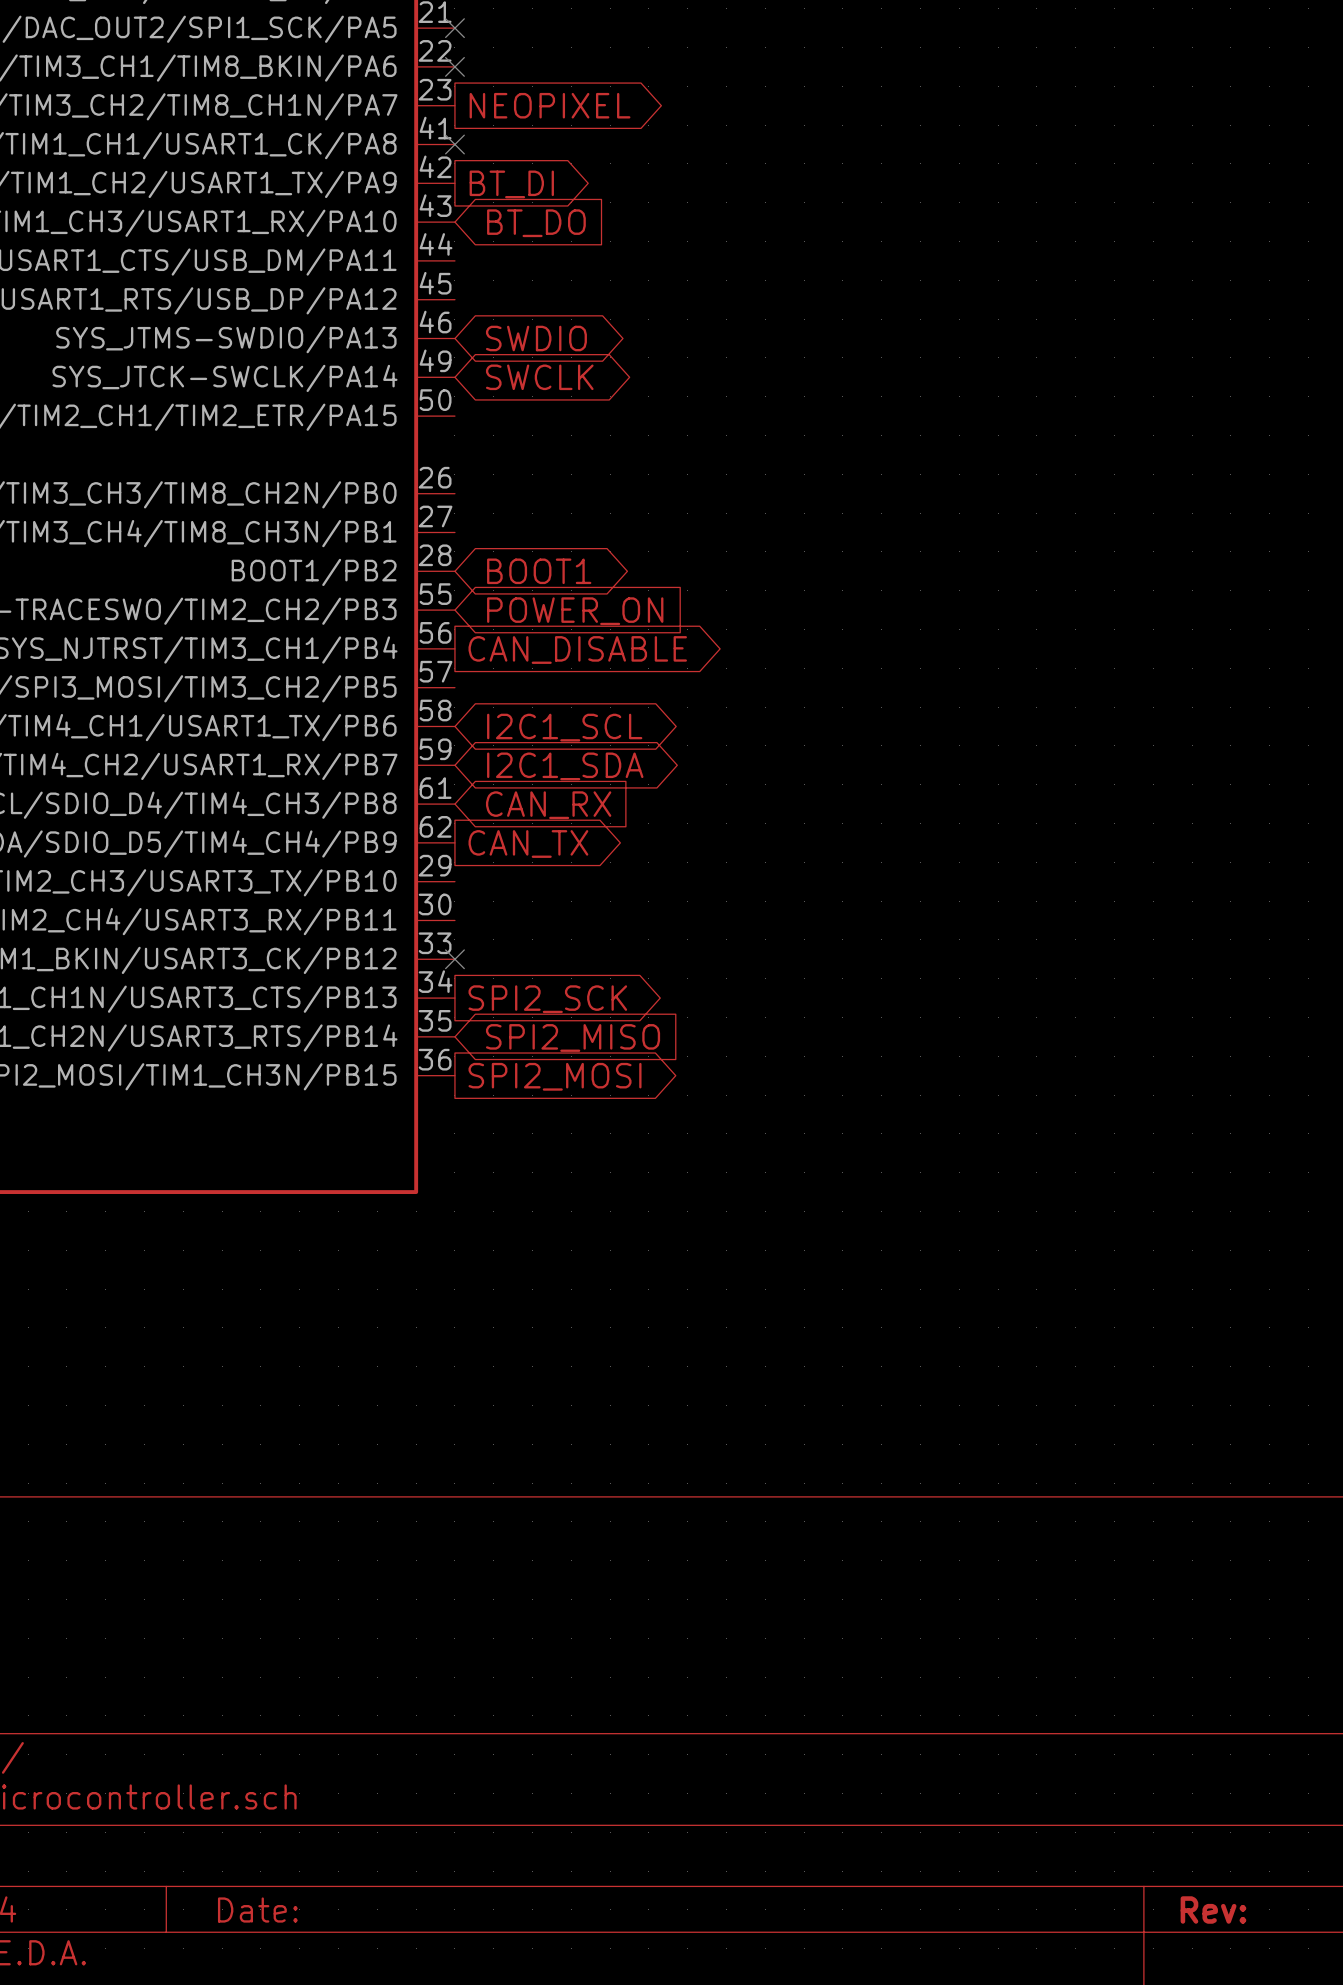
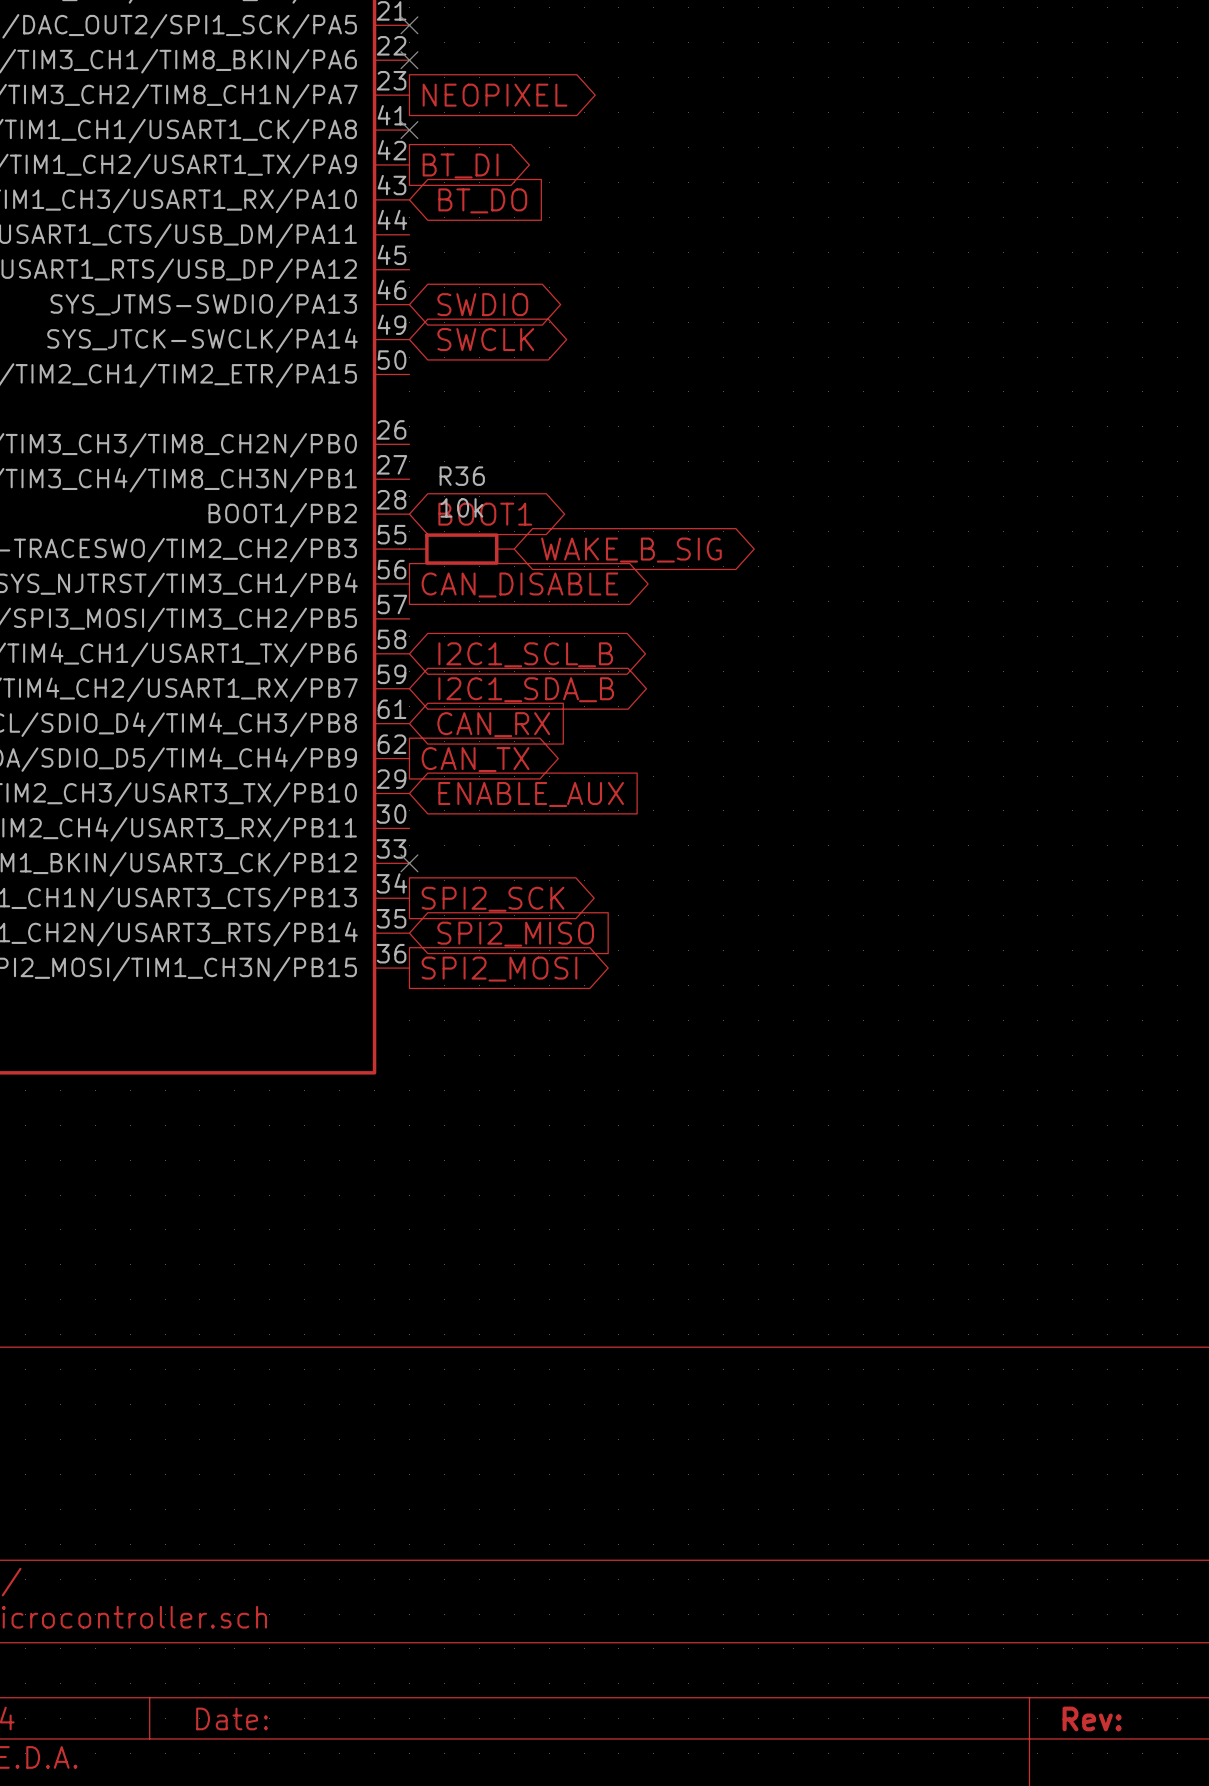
R36: none -> 10k (461, 549)
global label: POWER_ON (575, 611) -> none
global label: none -> WAKE_B_SIG (631, 550)
global label: I2C1_SCL (564, 727) -> I2C1_SCL_B (525, 654)
global label: I2C1_SDA (565, 766) -> I2C1_SDA_B (526, 689)
global label: none -> ENABLE_AUX (531, 794)

